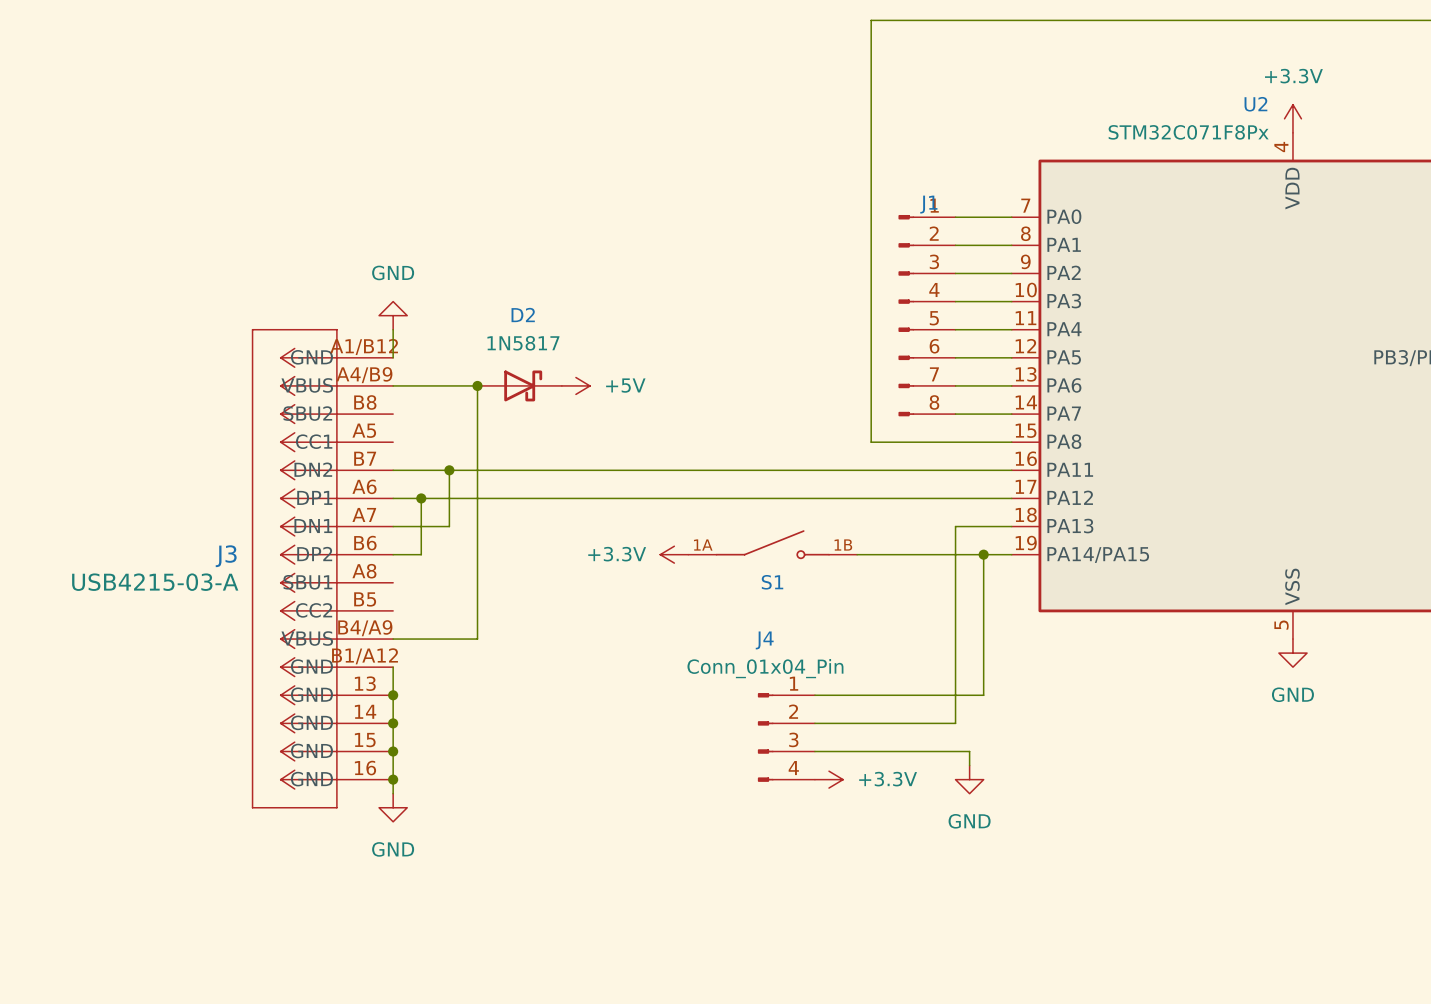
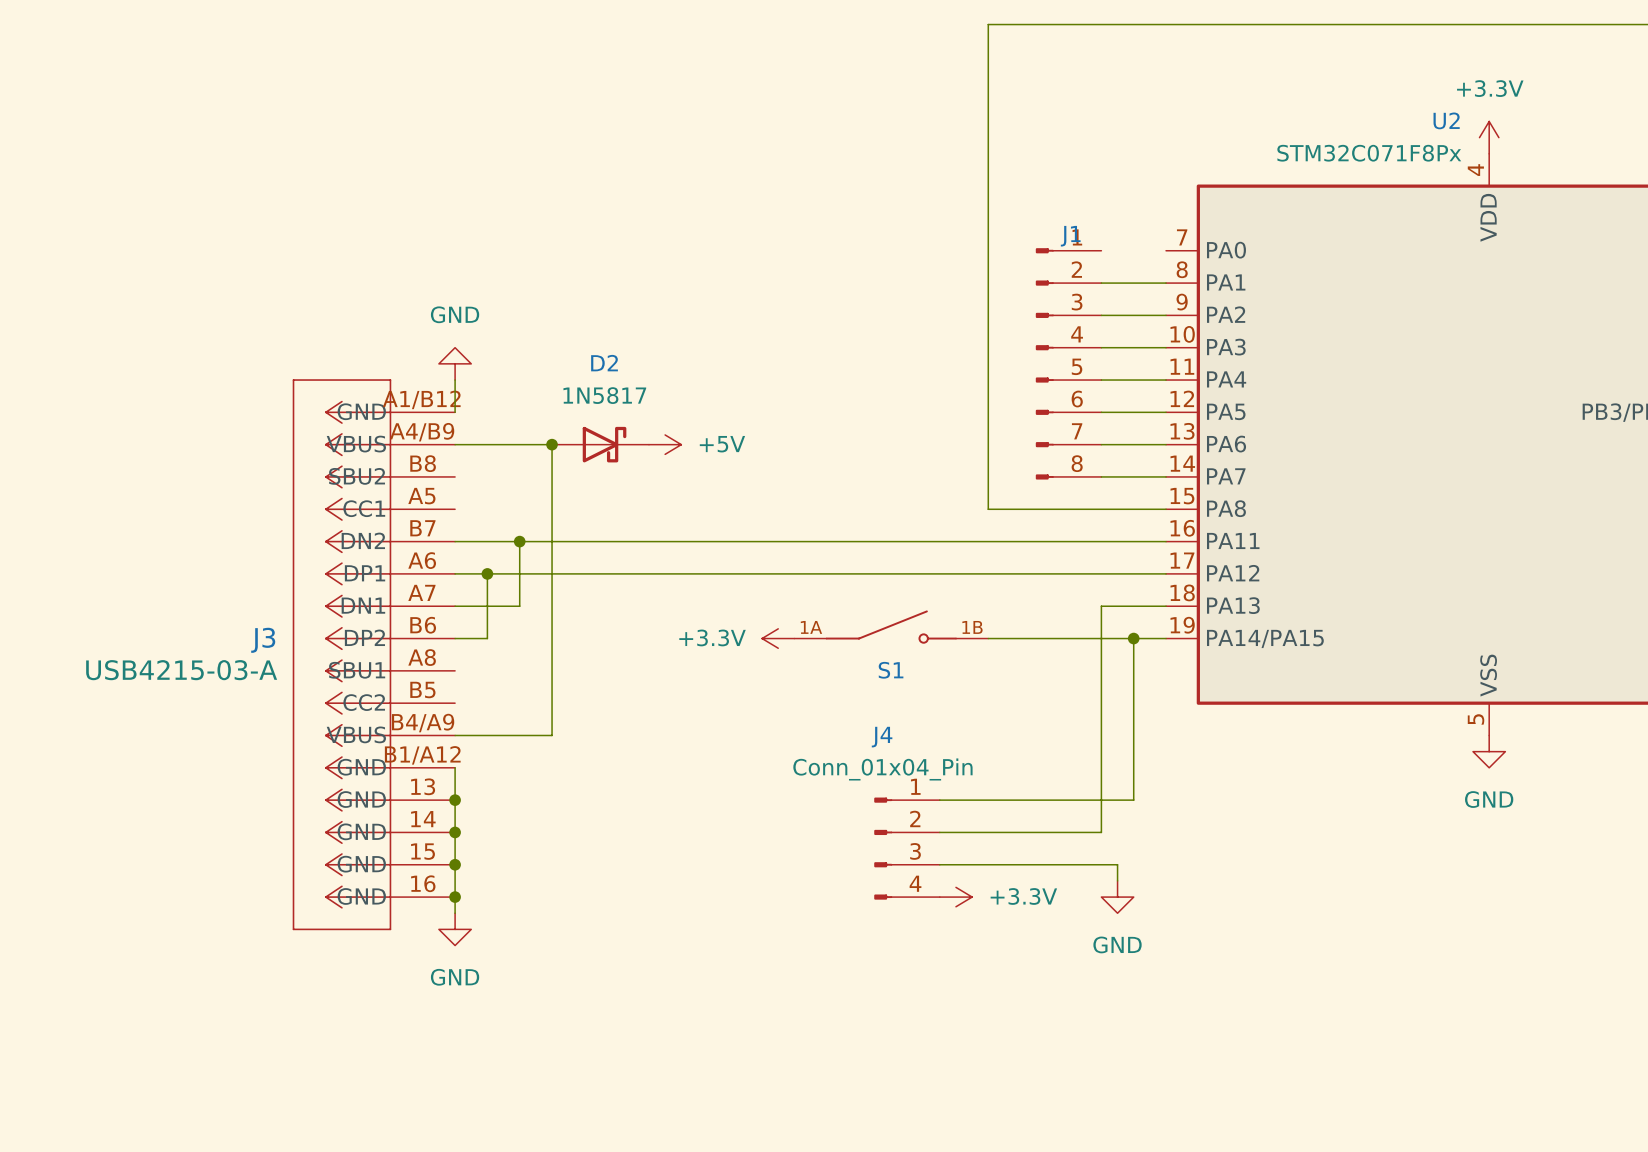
wire: (871, 20) (871, 442) -> (1004, 24) (988, 24) (988, 509) (1004, 509)
wire: (955, 217) (1011, 217) -> none

